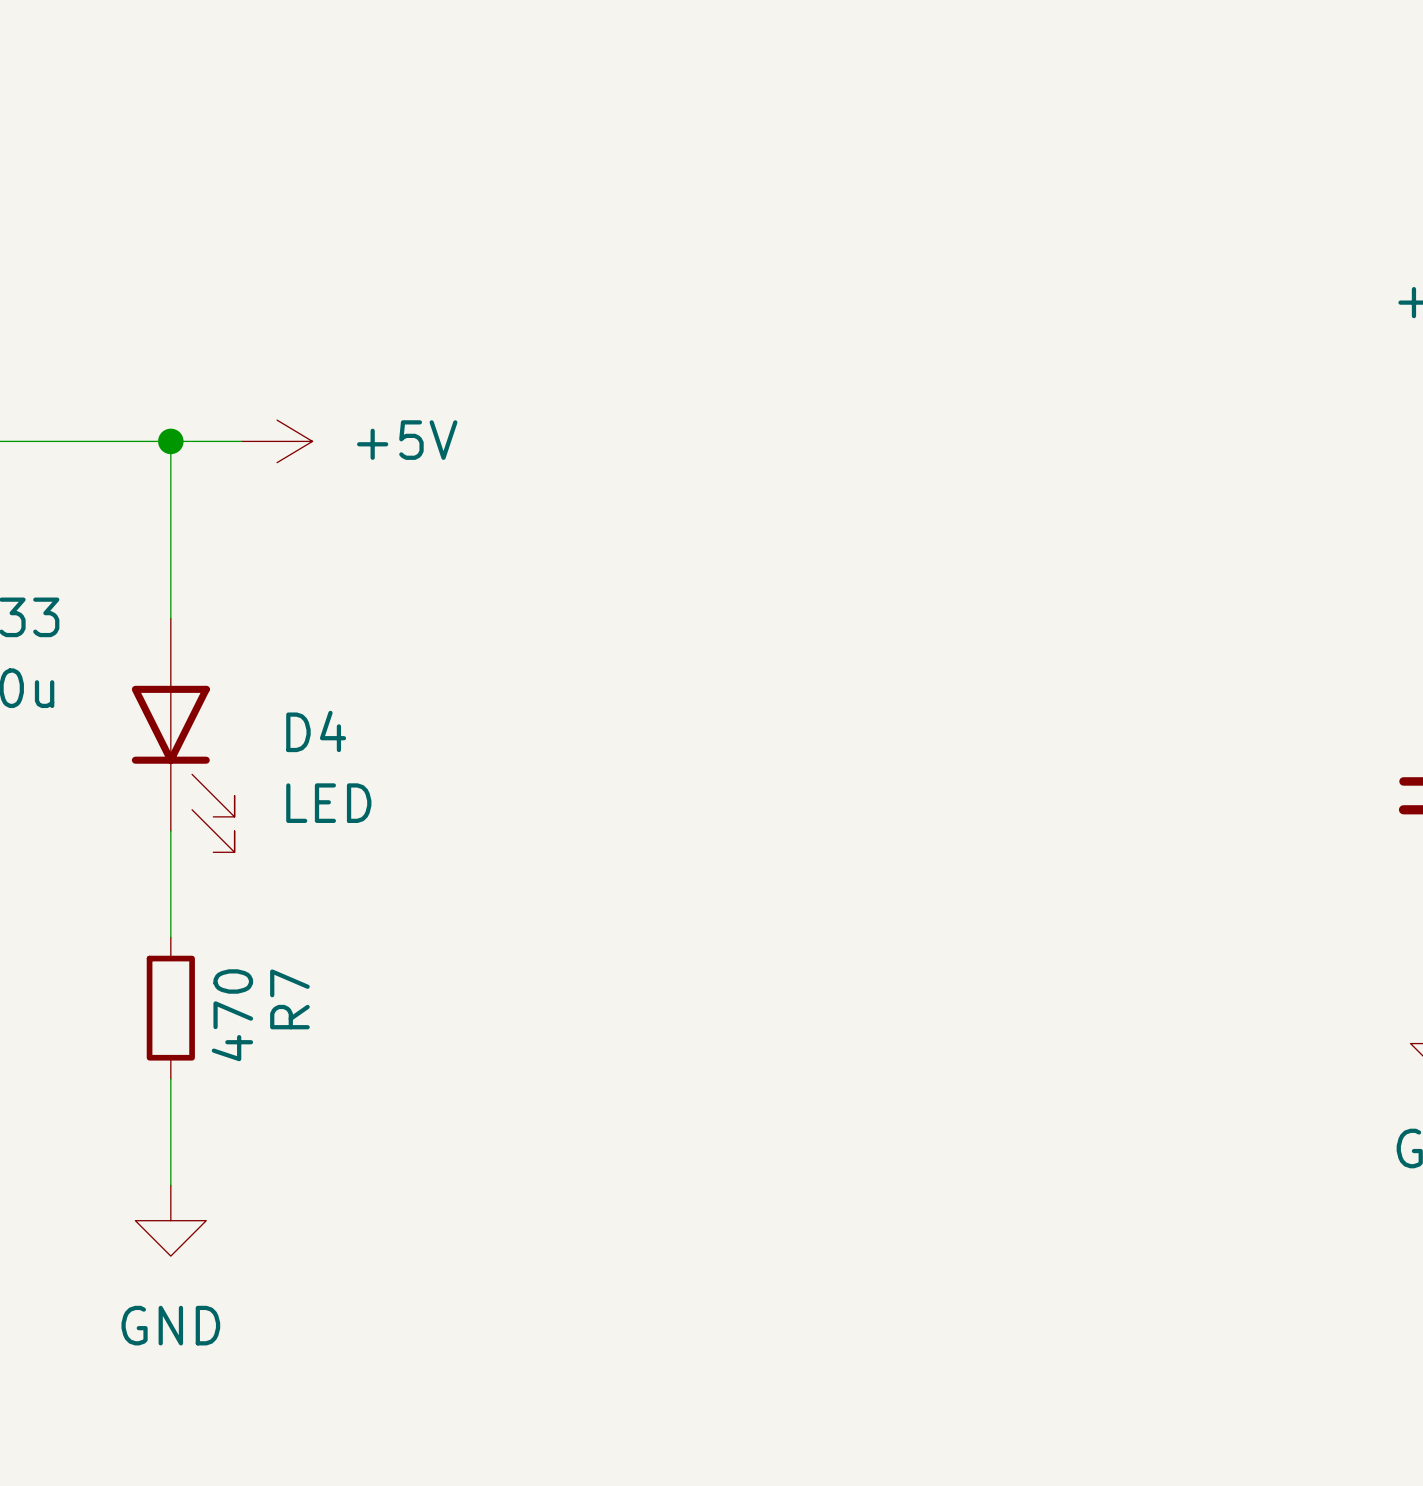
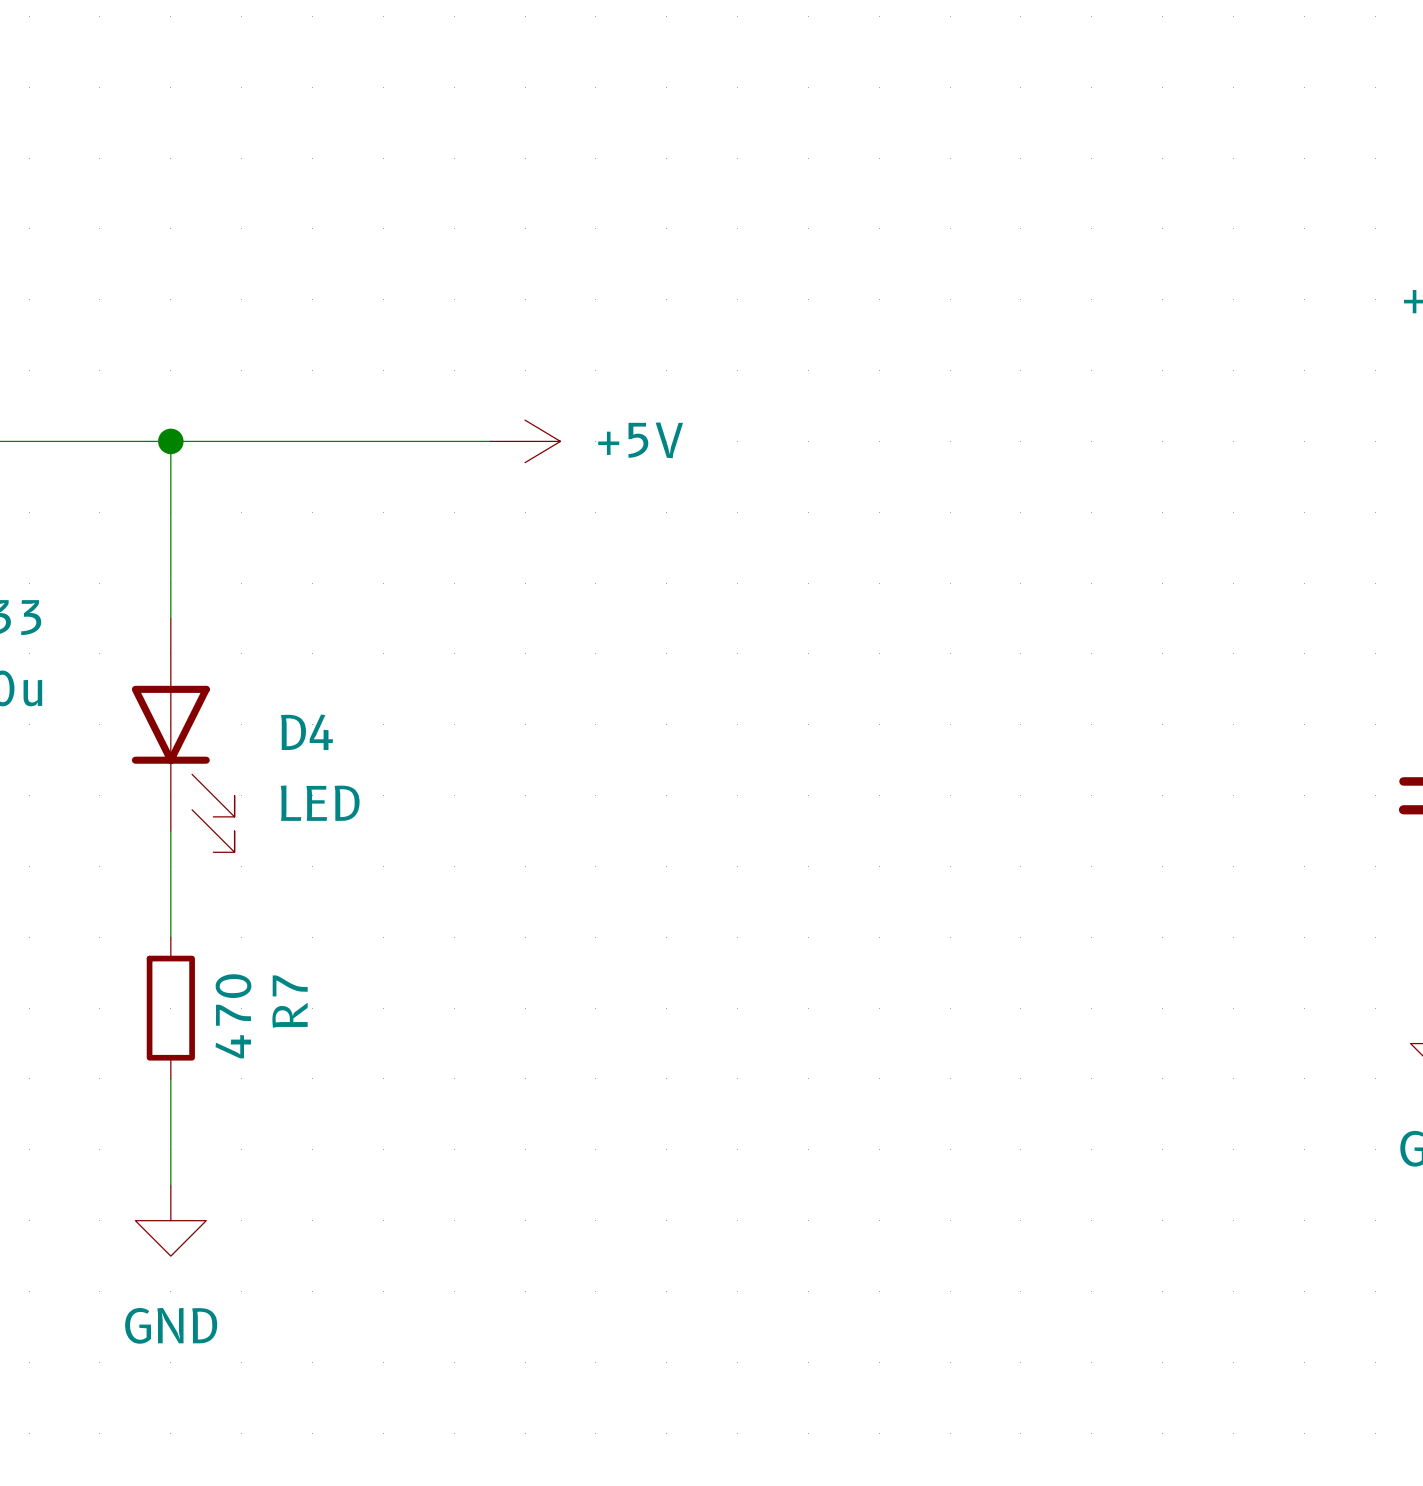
wire: none -> (241, 441) (489, 441)
power symbol position: +5V (277, 441) -> +5V (525, 441)

